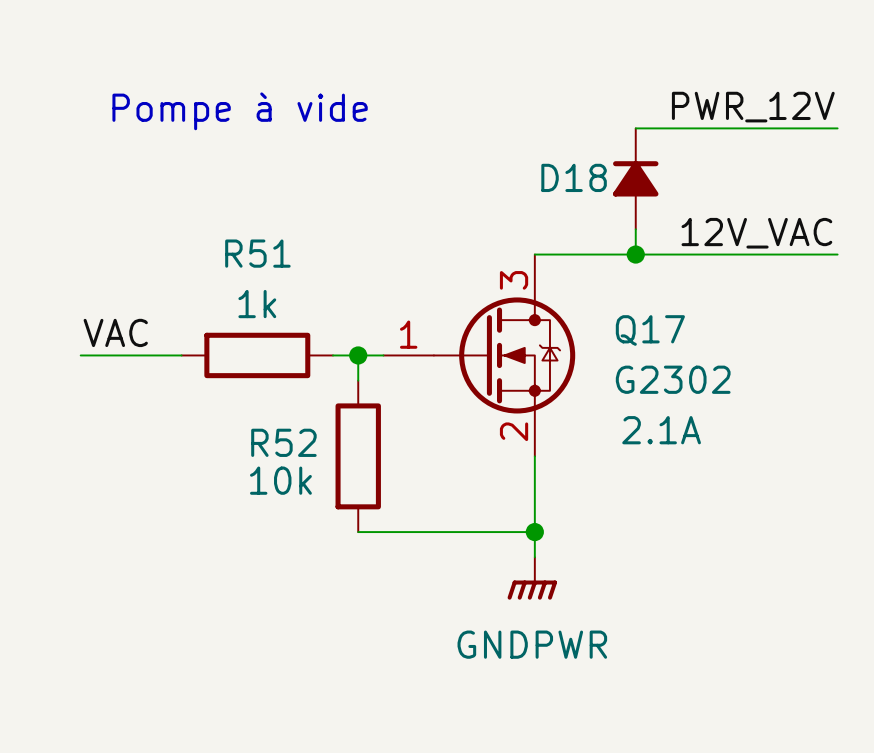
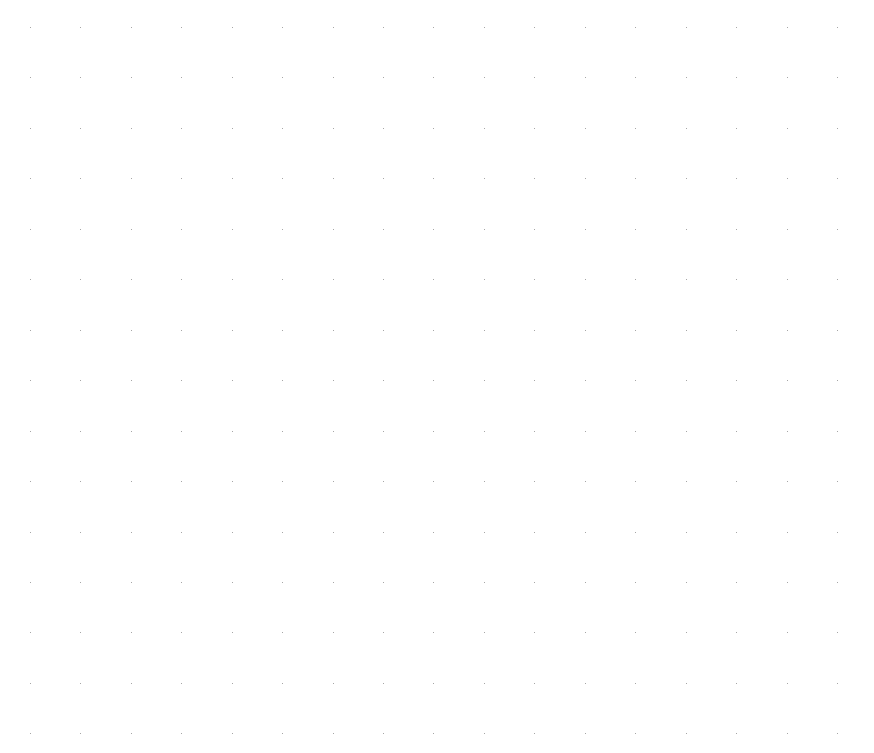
label: PWR_12V (753, 107) -> none
text: Pompe à vide (240, 111) -> none
wire: (635, 128) (837, 128) -> none
D18: (635, 178) -> none
wire: (635, 229) (635, 254) -> none
label: 12V_VAC (756, 233) -> none
wire: (534, 254) (837, 254) -> none
junction: (635, 254) -> none
label: VAC (115, 332) -> none
wire: (80, 355) (181, 355) -> none
R51: 1k (257, 355) -> none
wire: (333, 355) (383, 355) -> none
wire: (358, 355) (358, 380) -> none
junction: (358, 355) -> none
Q17: G2302 (479, 355) -> none
R52: 10k (358, 456) -> none
wire: (534, 456) (534, 557) -> none
wire: (358, 532) (534, 532) -> none
junction: (534, 532) -> none
power symbol: GNDPWR (532, 578) -> none

